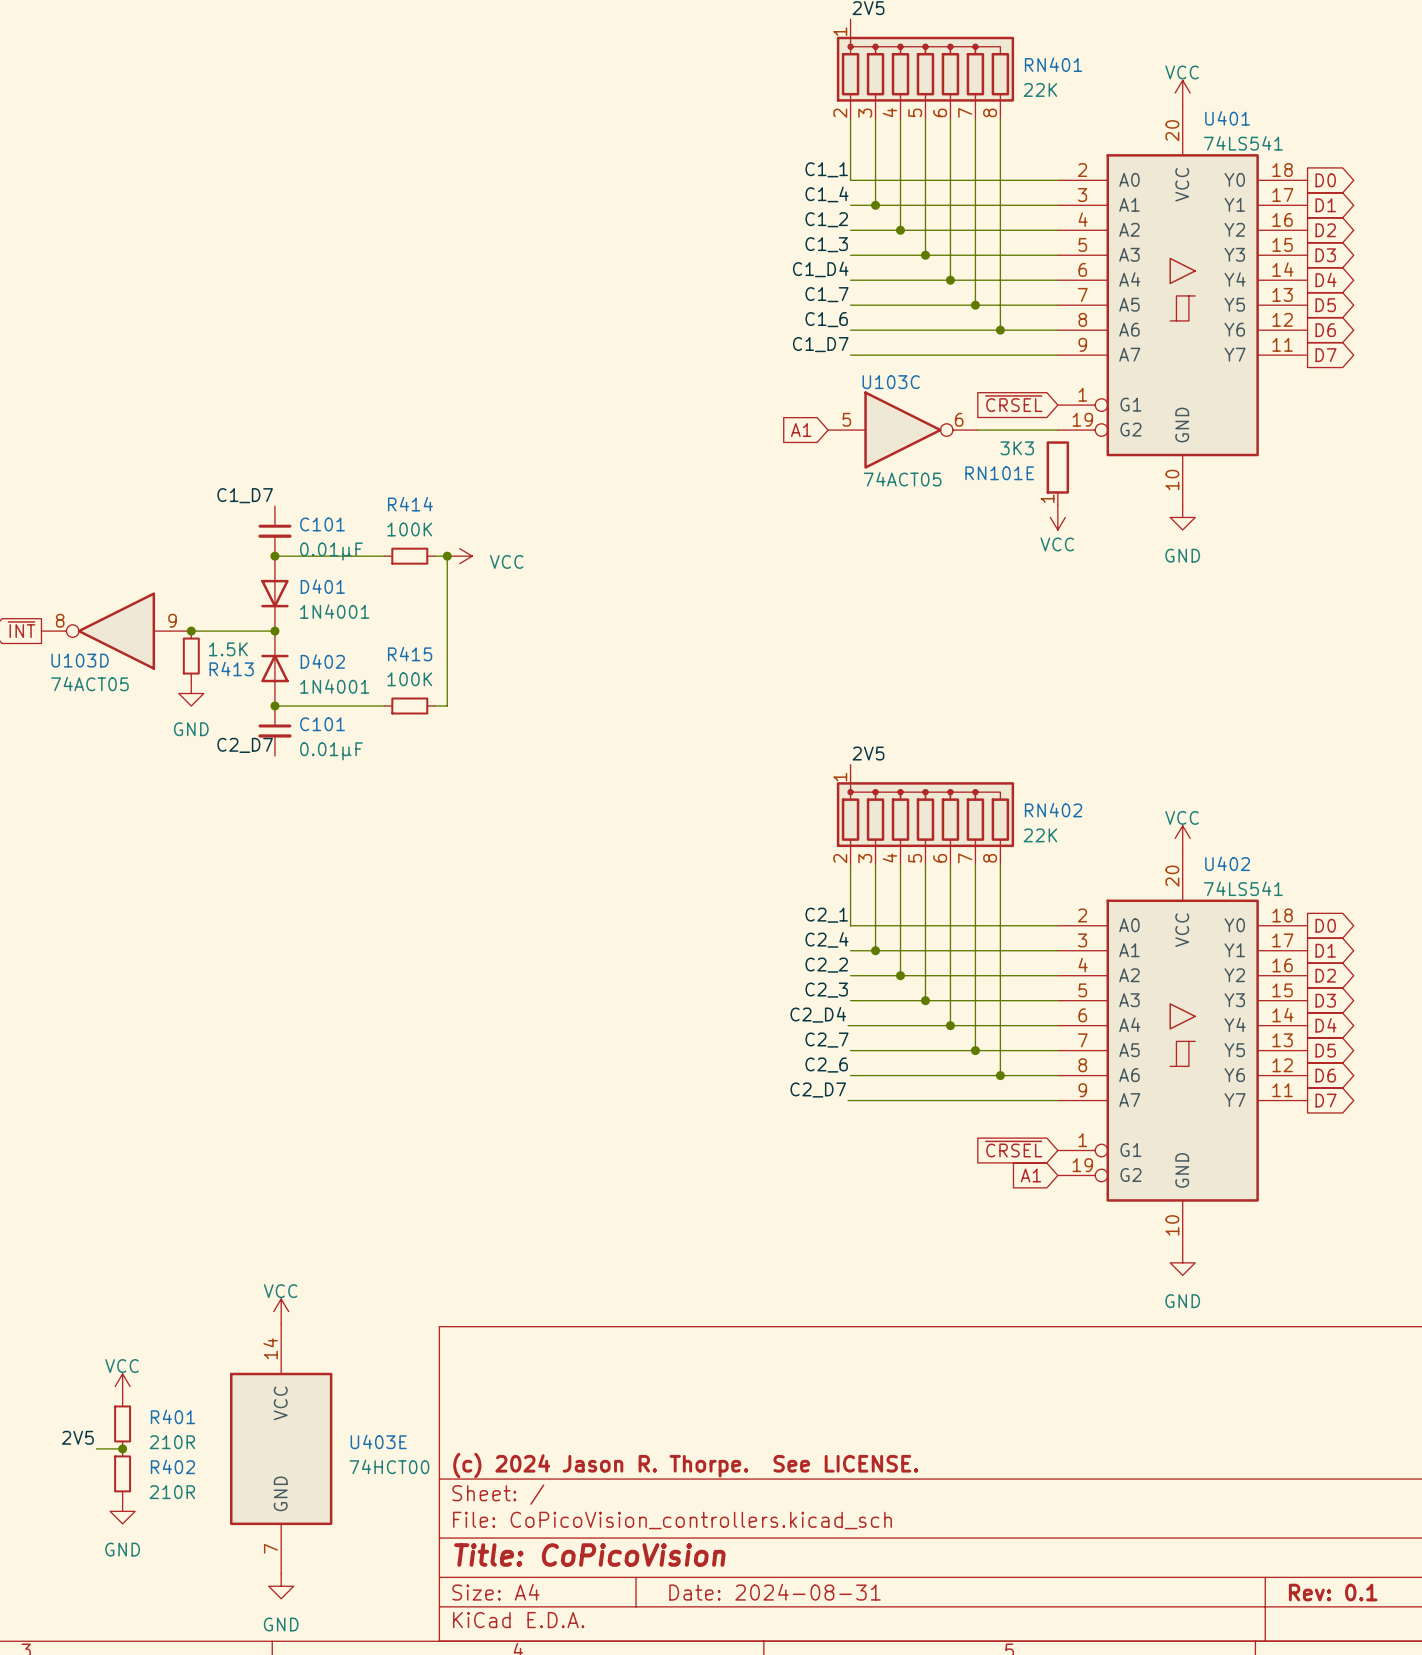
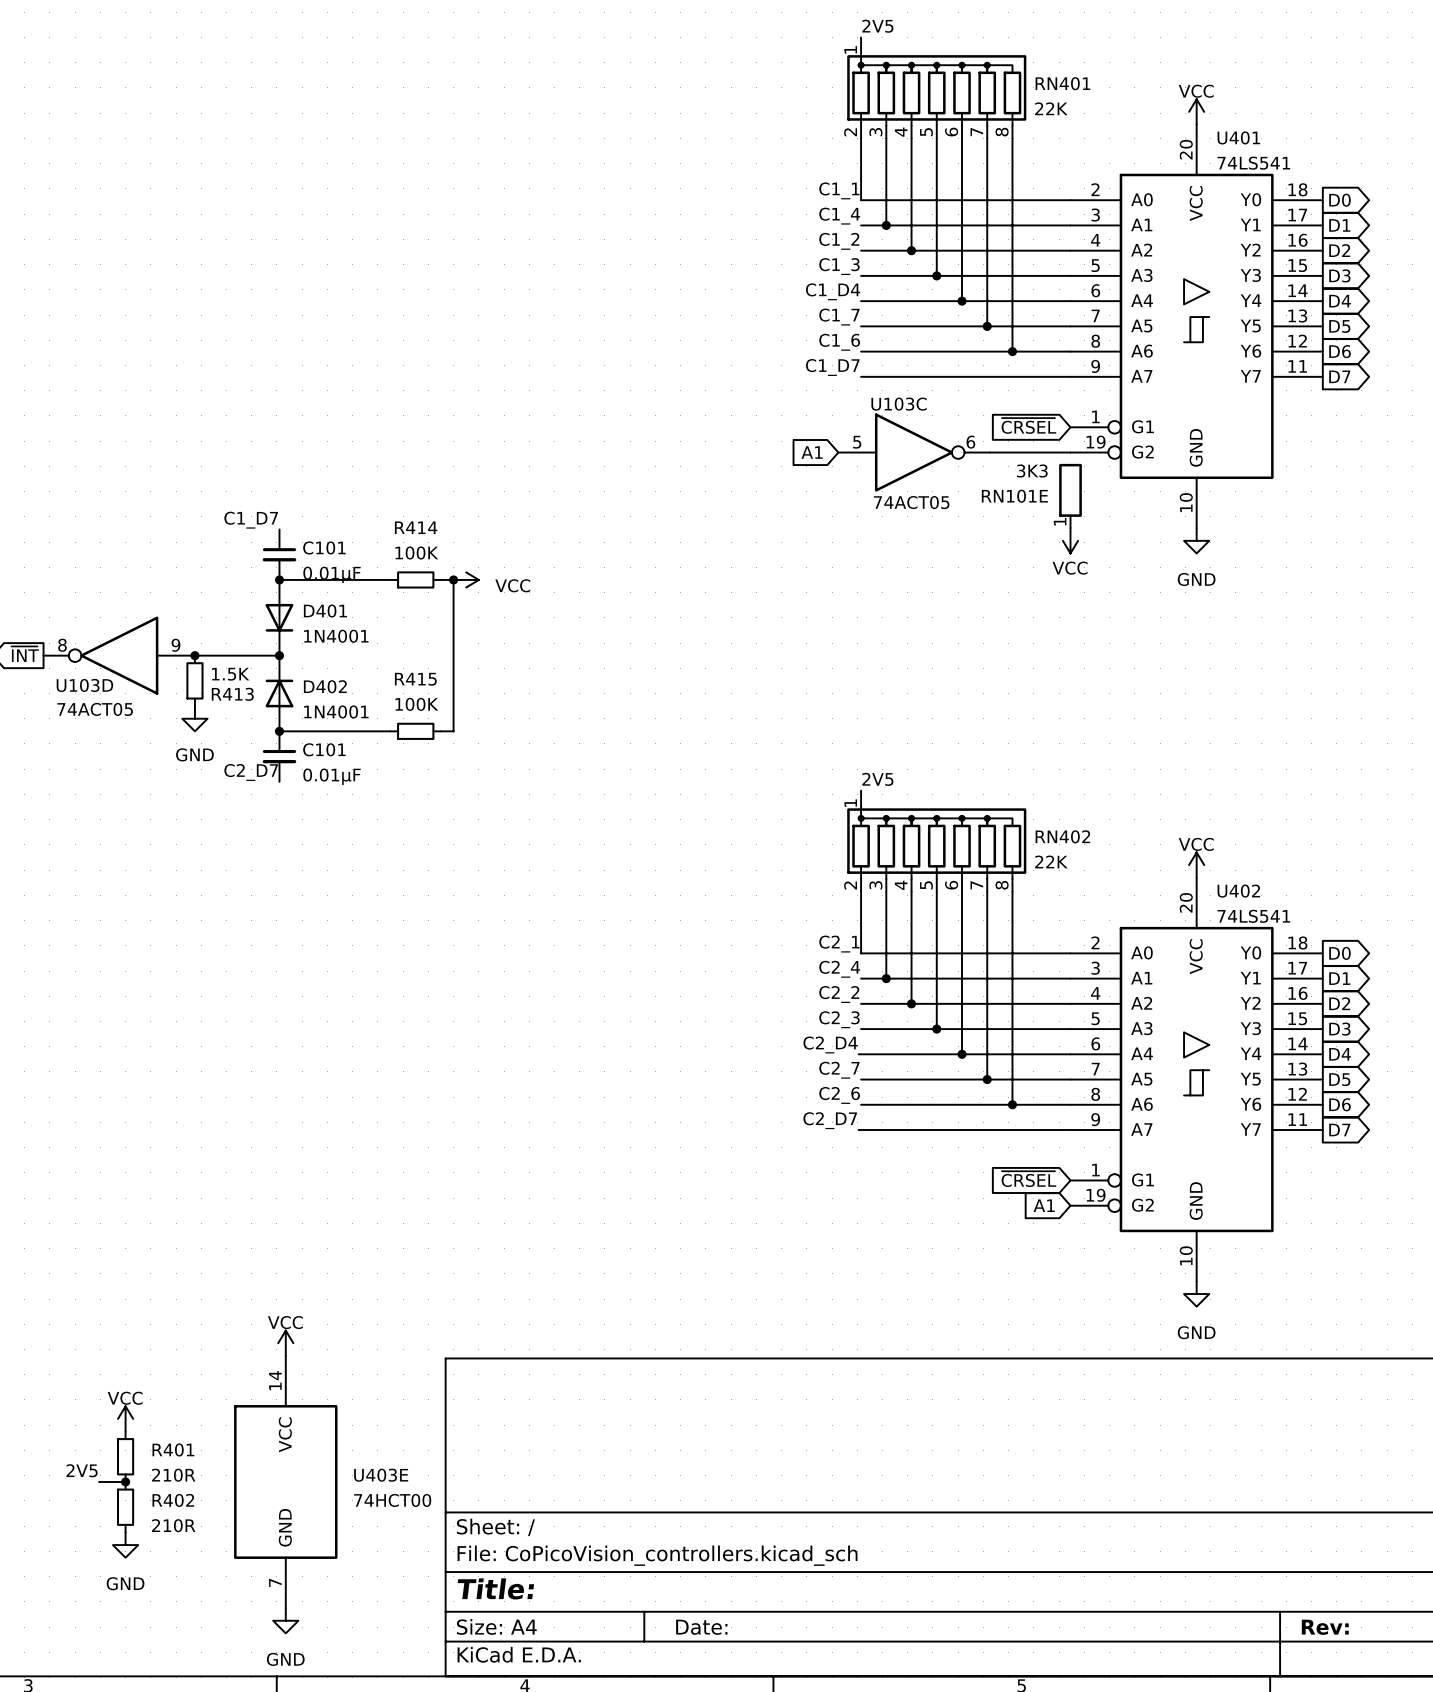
title block: (c) 2024 Jason R. Thorpe. See LICENSE. (685, 1465) -> none
title block: Title: CoPicoVision (589, 1555) -> Title: (495, 1588)
title block: Date: 2024-08-31 (775, 1592) -> Date: (701, 1627)
title block: Rev: 0.1 (1333, 1592) -> Rev: (1325, 1627)

